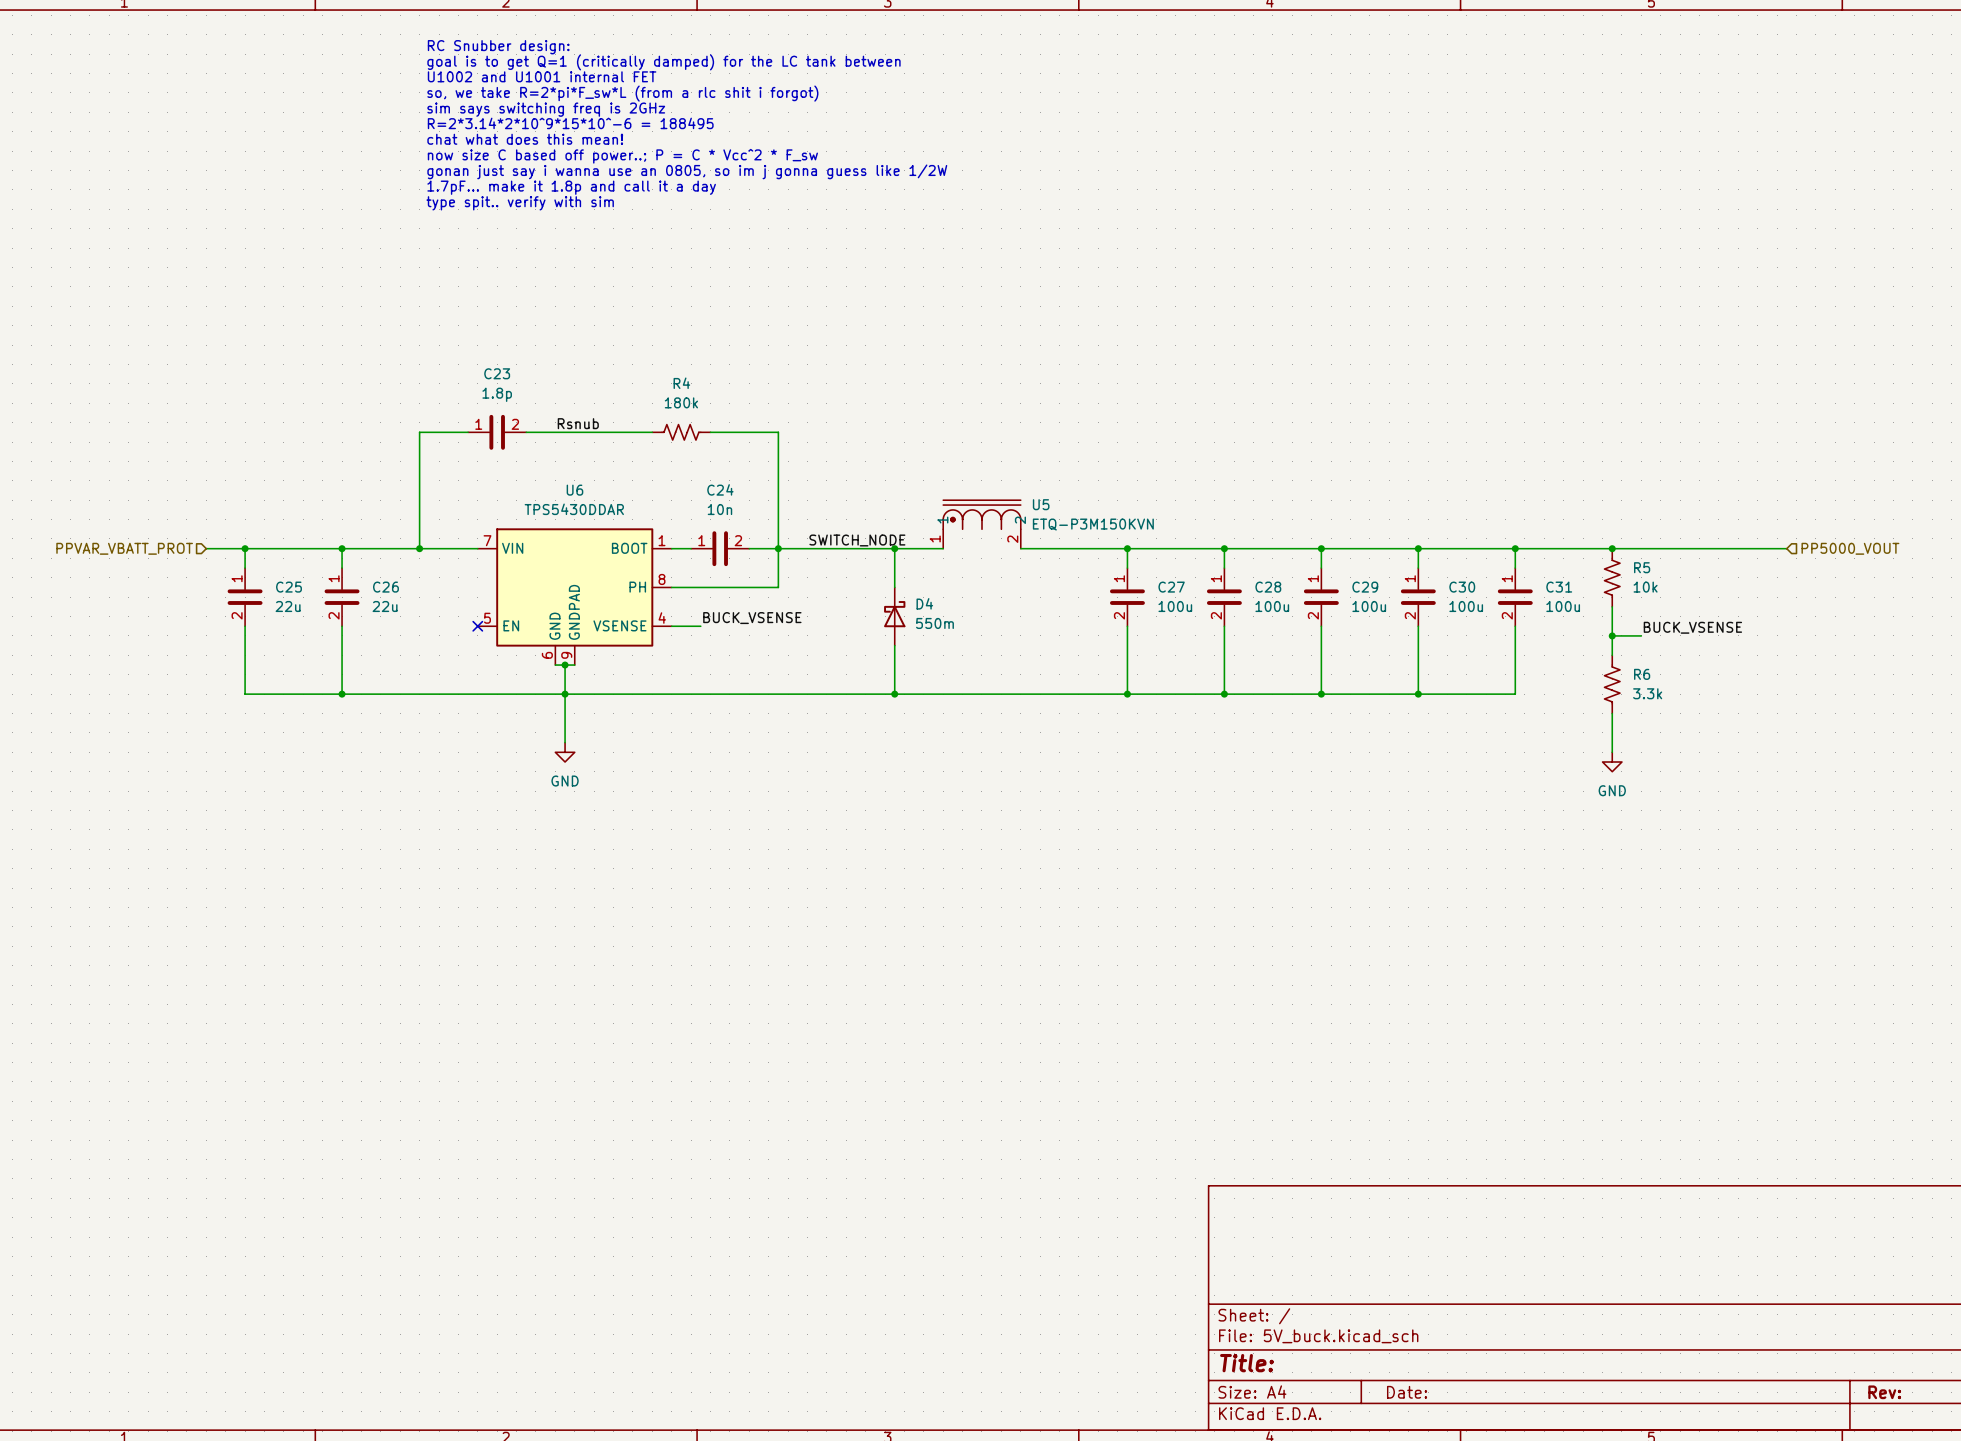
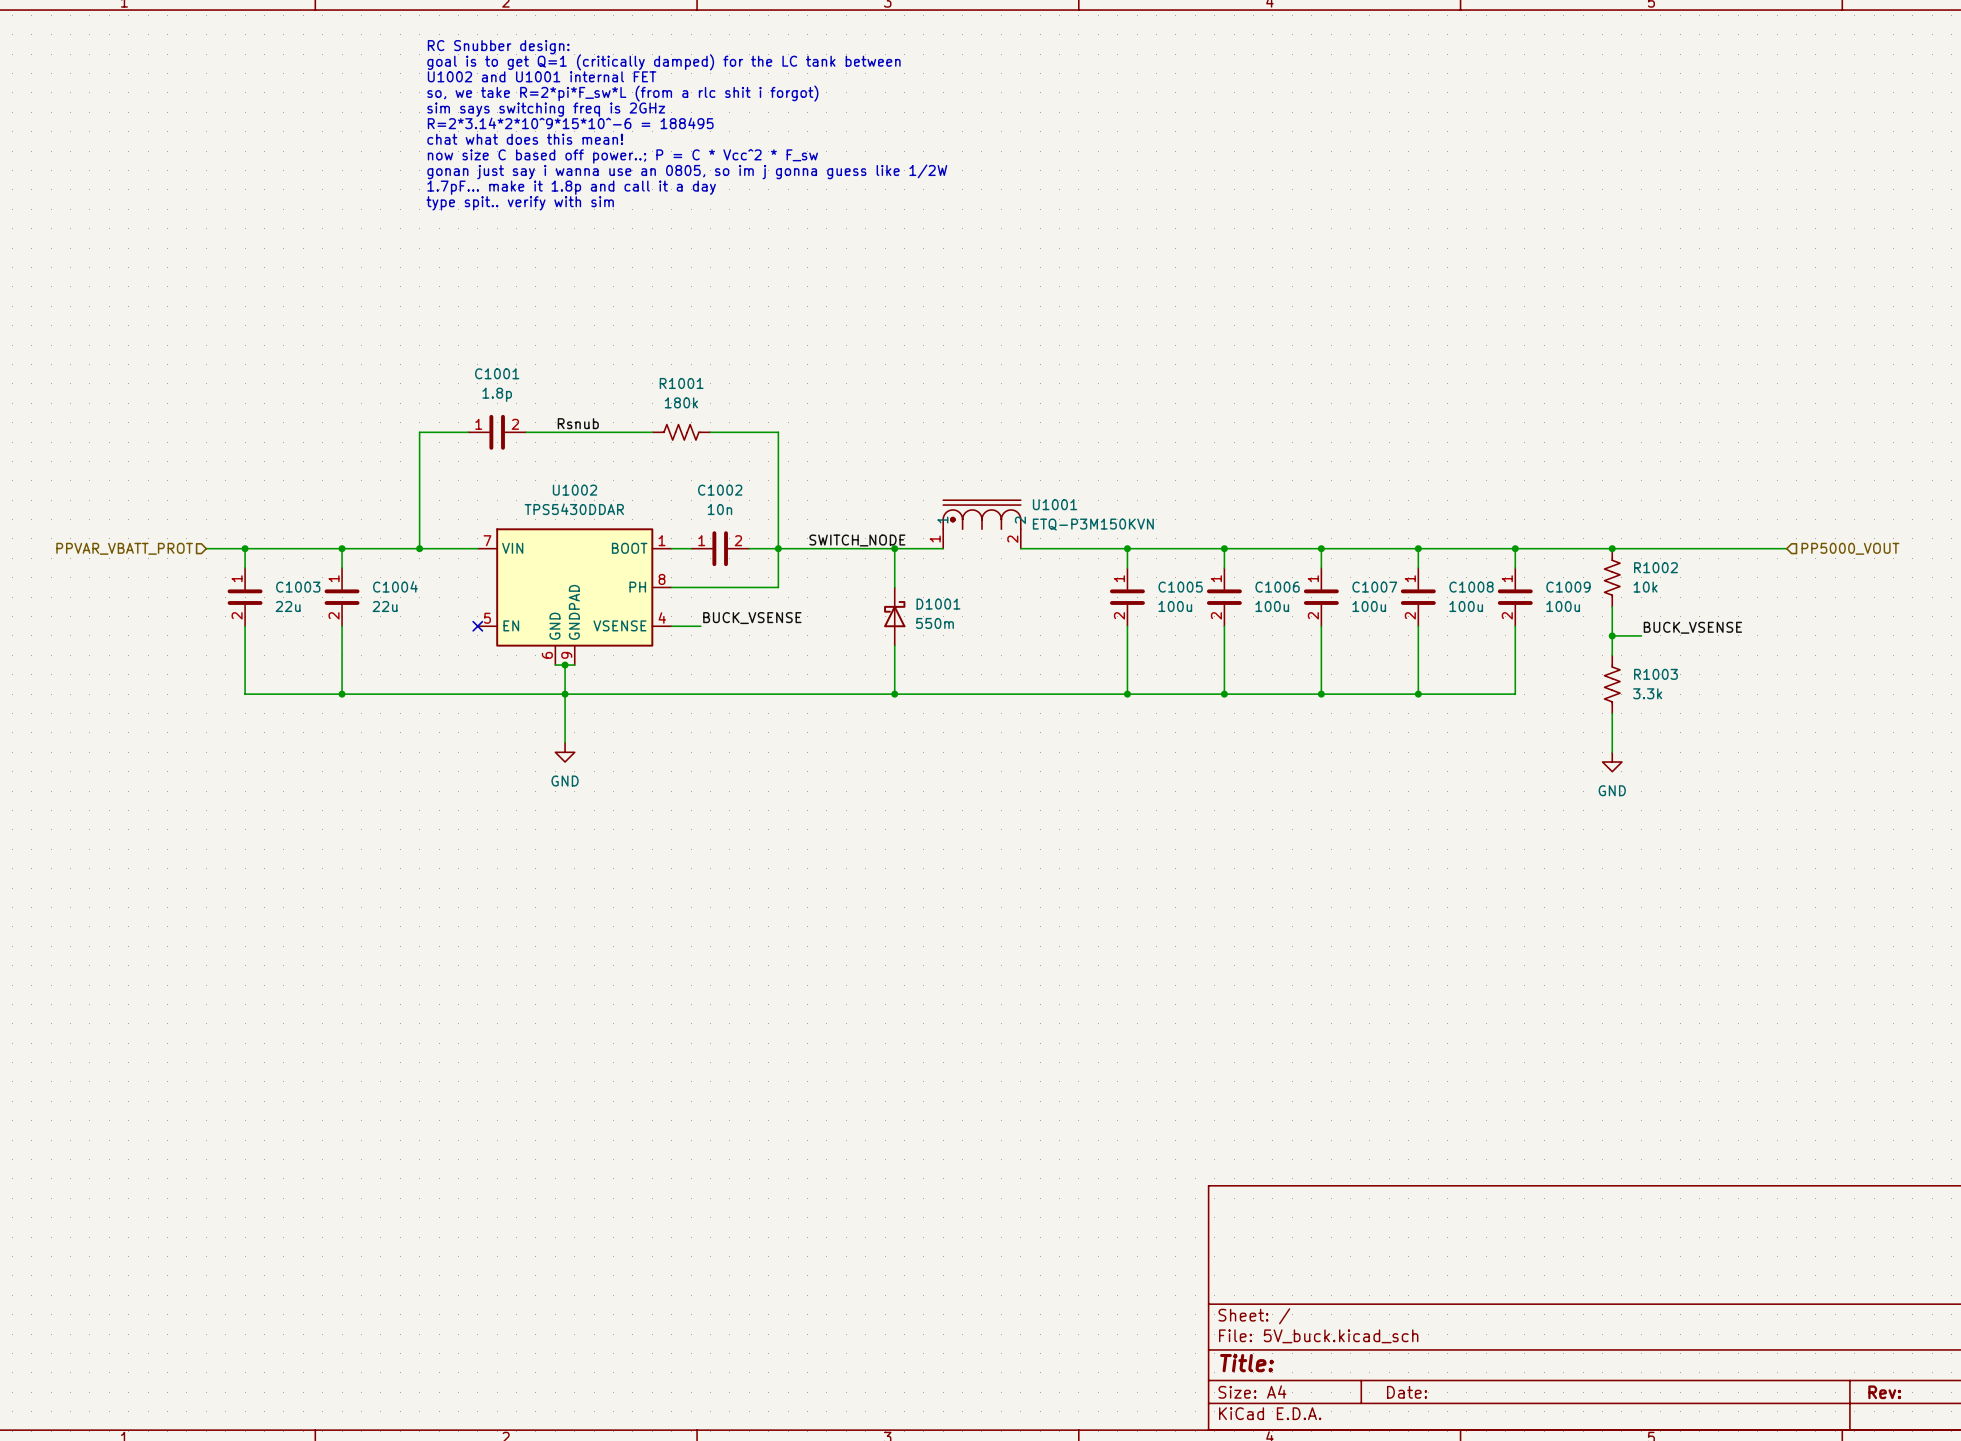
C23 name: C23 (497, 373) -> C1001 (497, 373)
R4 name: R4 (681, 383) -> R1001 (681, 383)
C24 name: C24 (720, 489) -> C1002 (720, 490)
U6 name: U6 (574, 490) -> U1002 (574, 490)
U5 name: U5 (1041, 504) -> U1001 (1055, 504)
R5 name: R5 (1642, 567) -> R1002 (1655, 567)
C25 name: C25 (289, 587) -> C1003 (298, 587)
C26 name: C26 (385, 587) -> C1004 (395, 586)
C27 name: C27 (1171, 587) -> C1005 (1180, 587)
C28 name: C28 (1268, 587) -> C1006 (1277, 587)
C29 name: C29 (1365, 587) -> C1007 (1374, 587)
C30 name: C30 (1462, 587) -> C1008 (1471, 587)
C31 name: C31 (1559, 587) -> C1009 (1568, 587)
D4 name: D4 (924, 603) -> D1001 (938, 604)
R6 name: R6 (1642, 674) -> R1003 (1655, 674)

